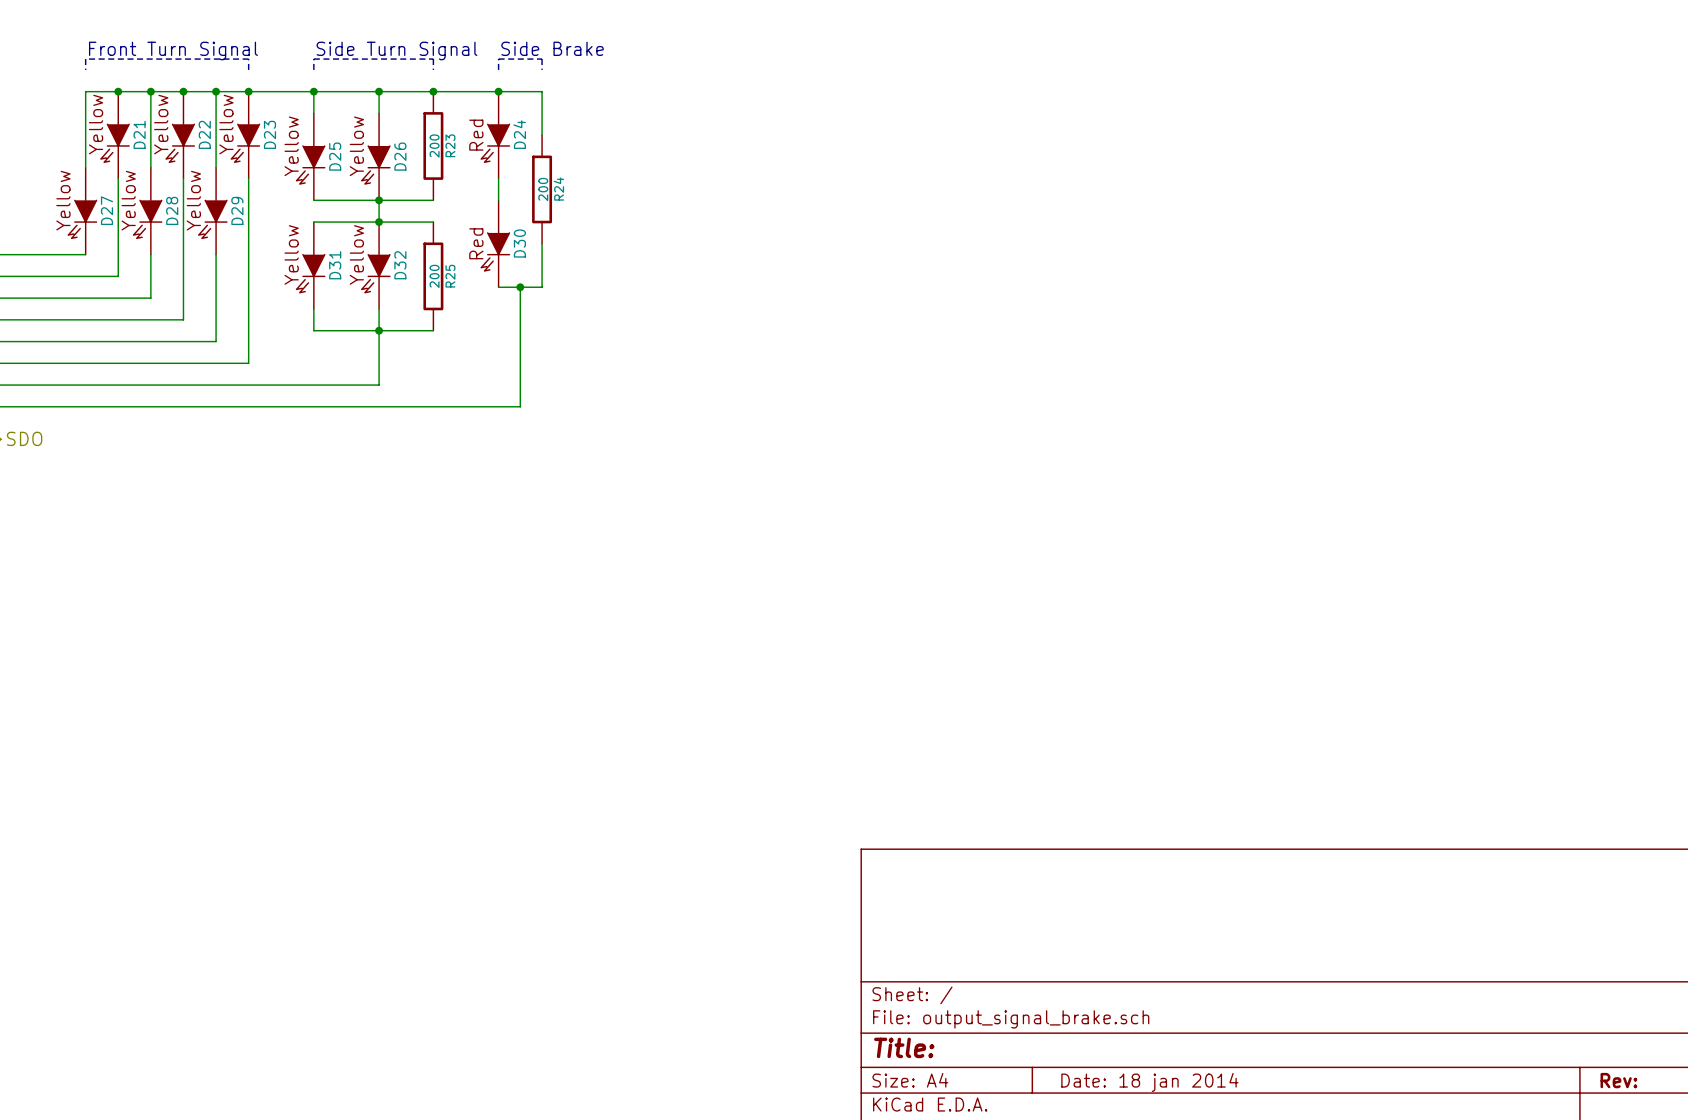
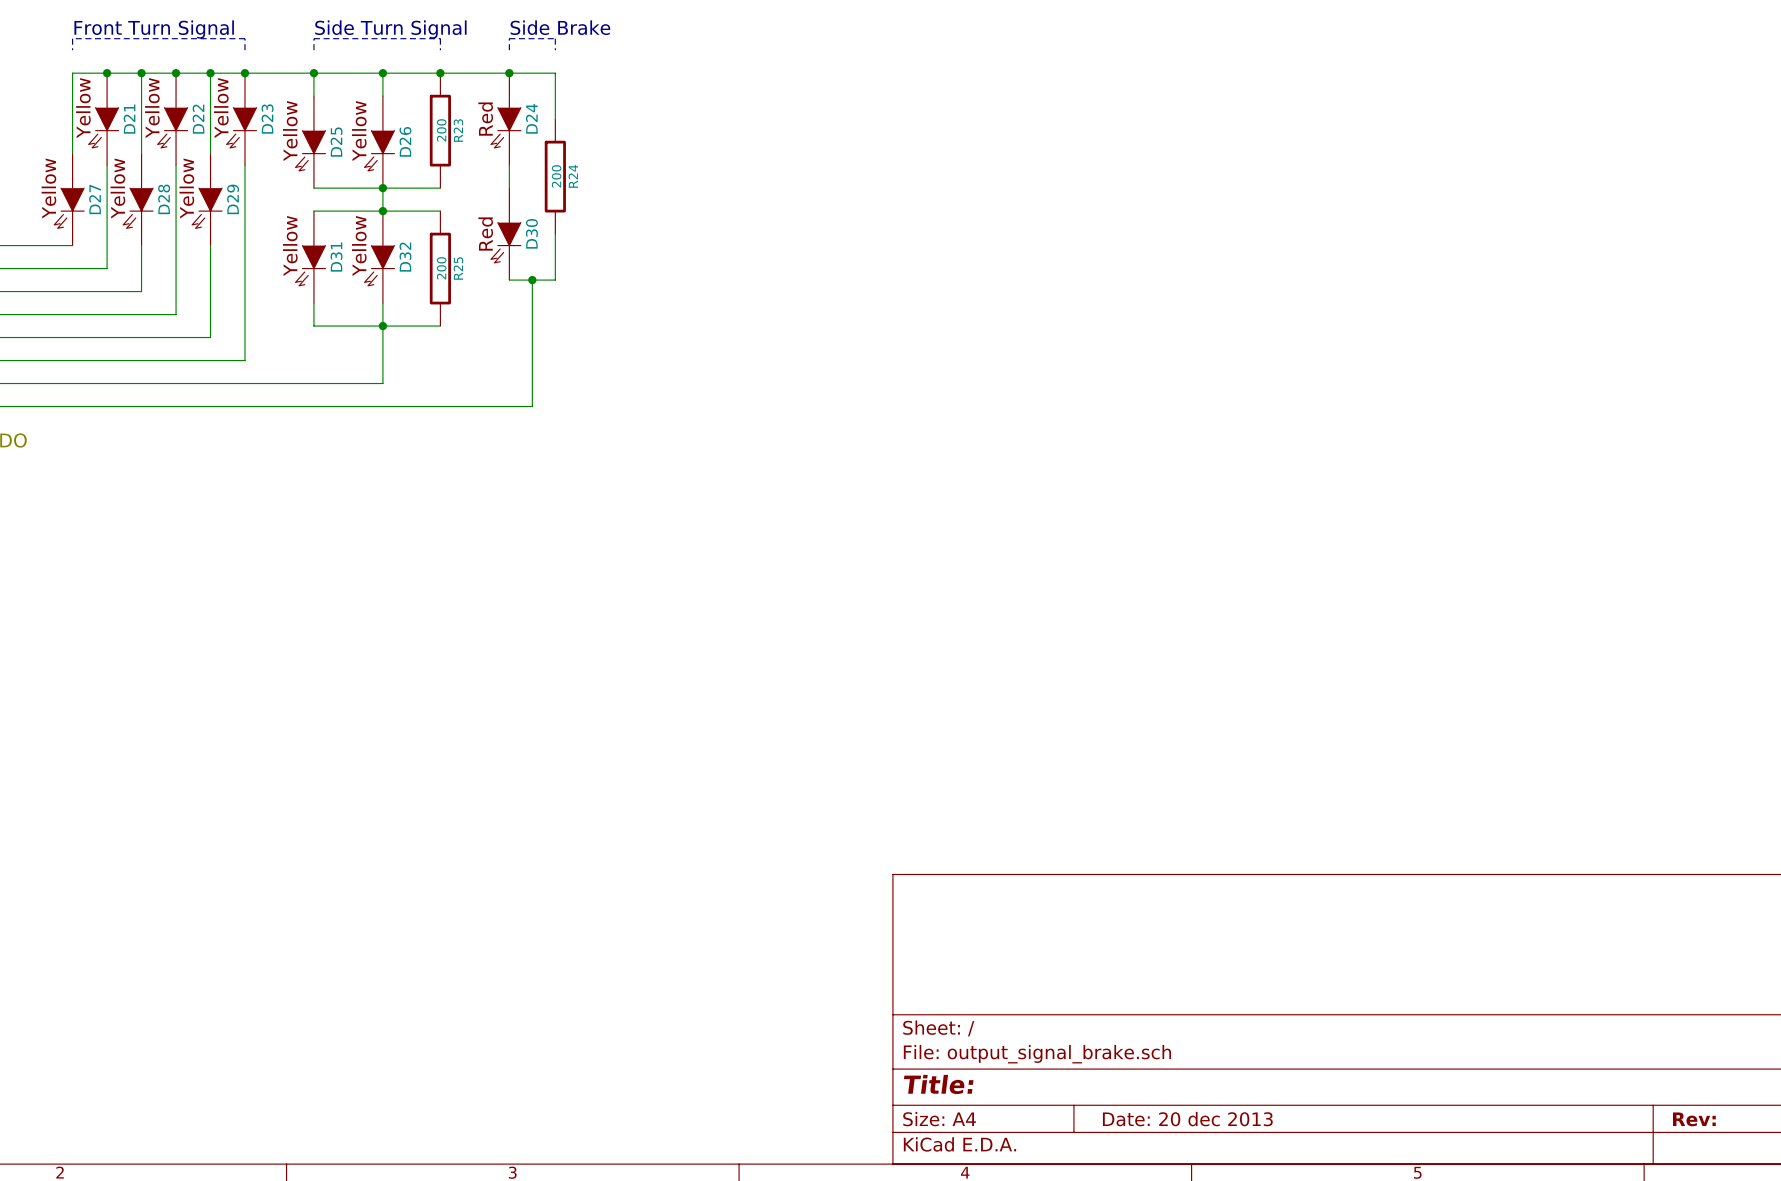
title block: Date: 18 jan 2014 (1149, 1082) -> Date: 20 dec 2013 (1187, 1119)

